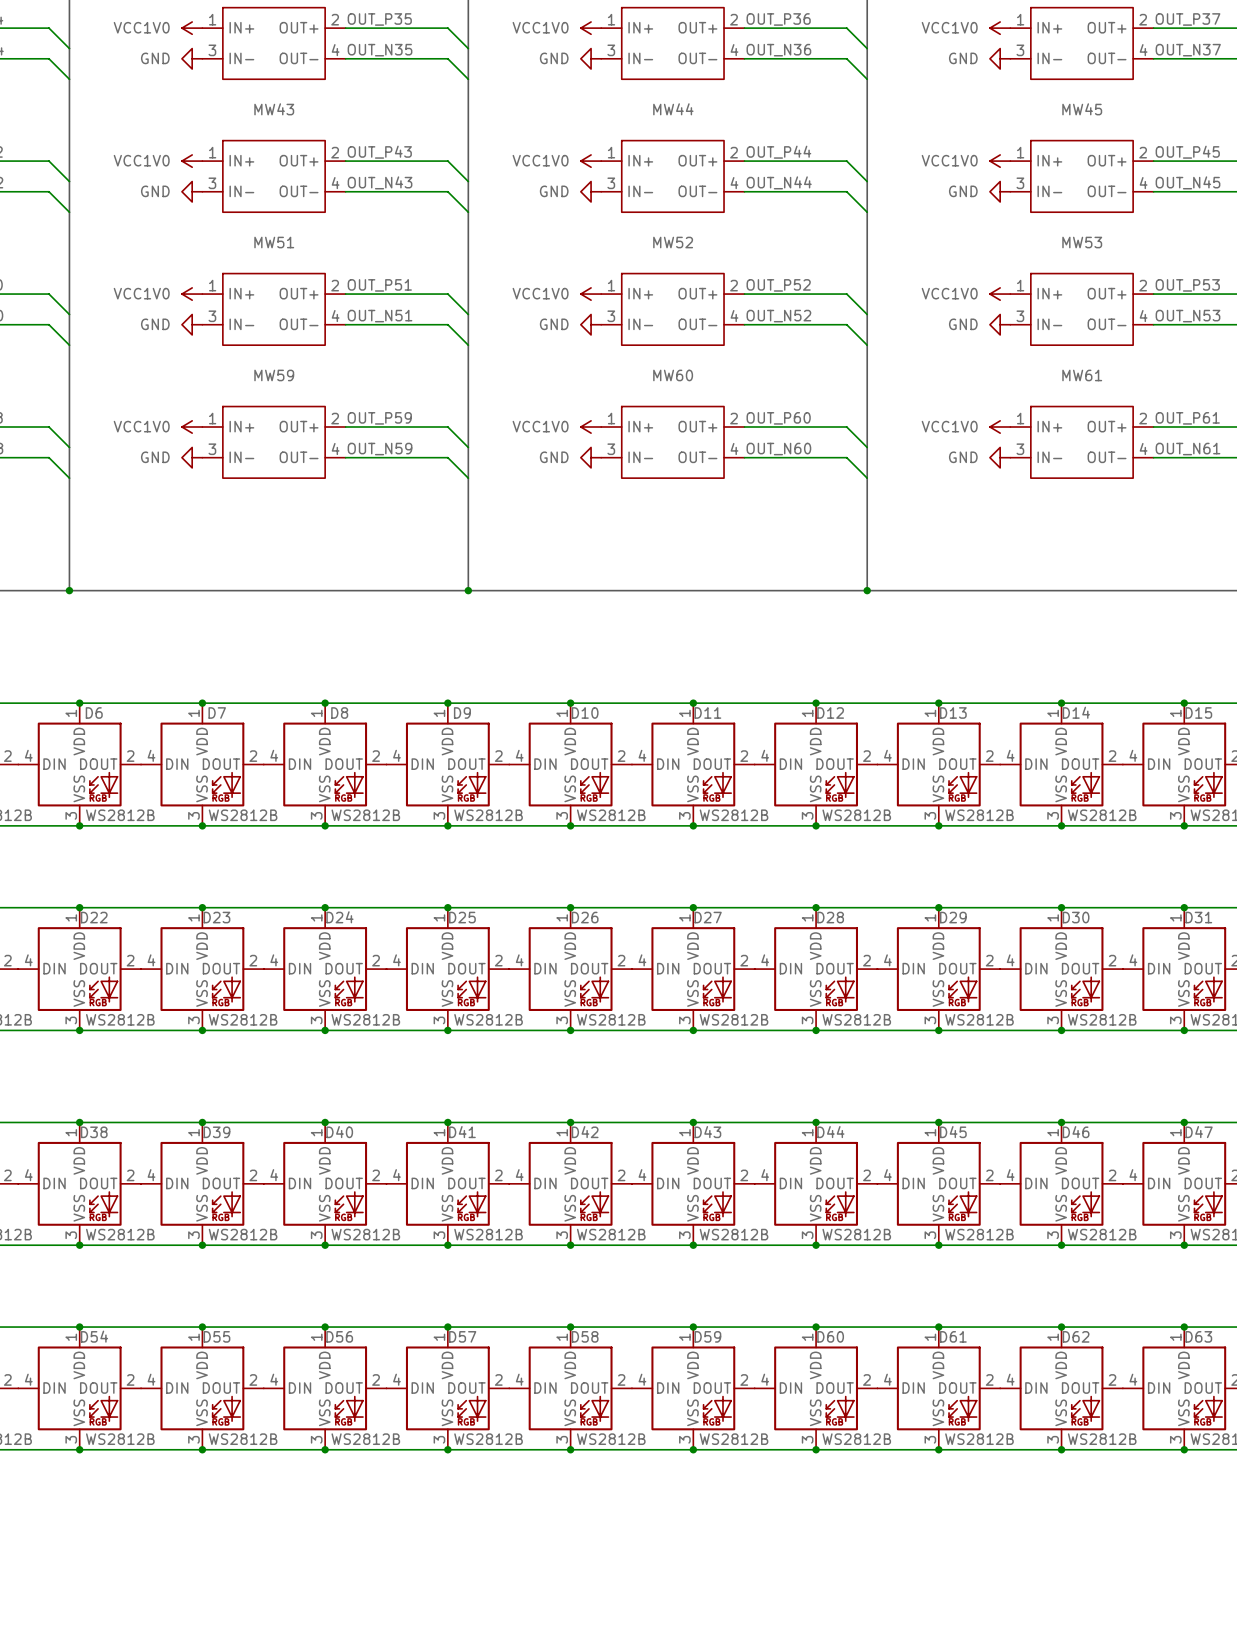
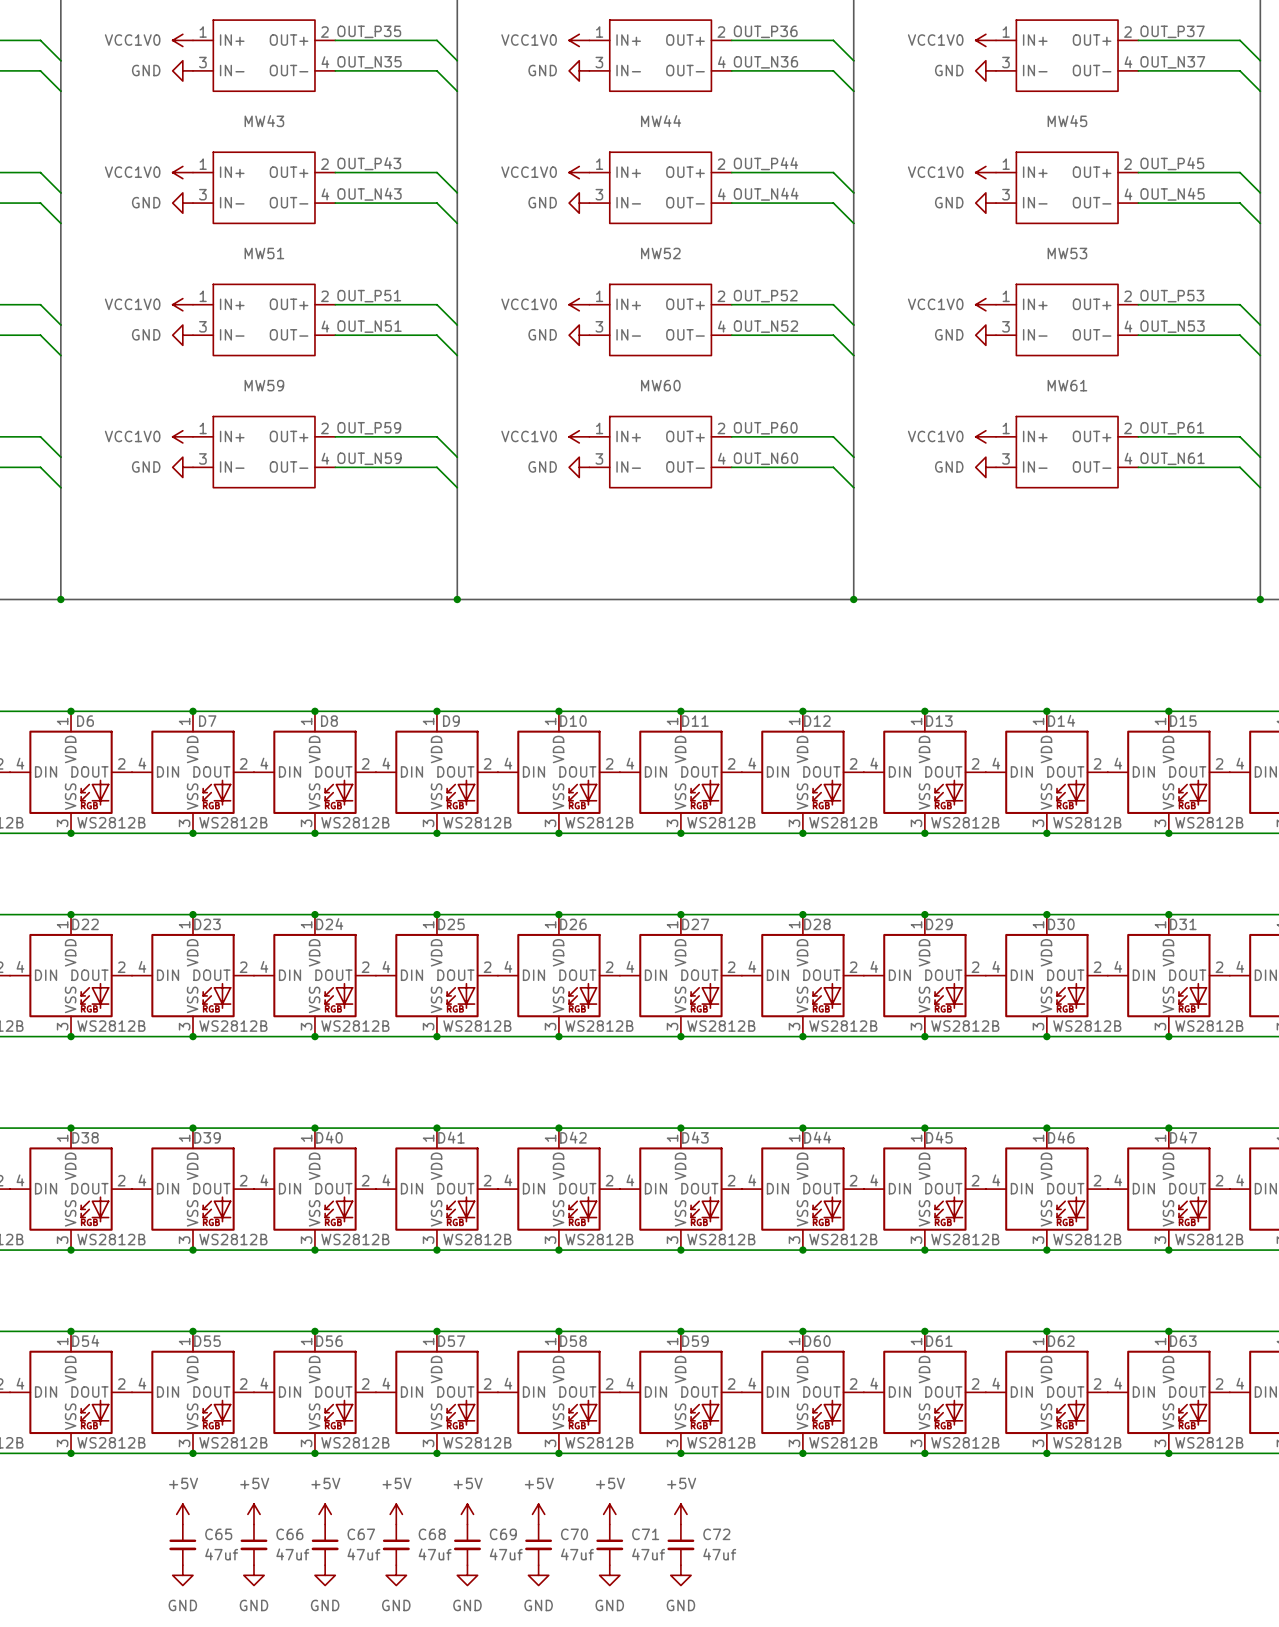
power symbol: none -> +5V (182, 1514)
power symbol: none -> +5V (253, 1514)
power symbol: none -> +5V (325, 1514)
power symbol: none -> +5V (396, 1514)
power symbol: none -> +5V (467, 1514)
power symbol: none -> +5V (538, 1514)
power symbol: none -> +5V (609, 1514)
power symbol: none -> +5V (680, 1514)
C65: none -> 47uf (182, 1544)
C66: none -> 47uf (253, 1544)
C67: none -> 47uf (325, 1544)
C68: none -> 47uf (396, 1544)
C69: none -> 47uf (467, 1544)
C70: none -> 47uf (538, 1544)
C71: none -> 47uf (609, 1544)
C72: none -> 47uf (680, 1544)
power symbol: none -> GND (182, 1575)
power symbol: none -> GND (253, 1575)
power symbol: none -> GND (325, 1575)
power symbol: none -> GND (396, 1575)
power symbol: none -> GND (467, 1575)
power symbol: none -> GND (538, 1575)
power symbol: none -> GND (609, 1575)
power symbol: none -> GND (680, 1575)

